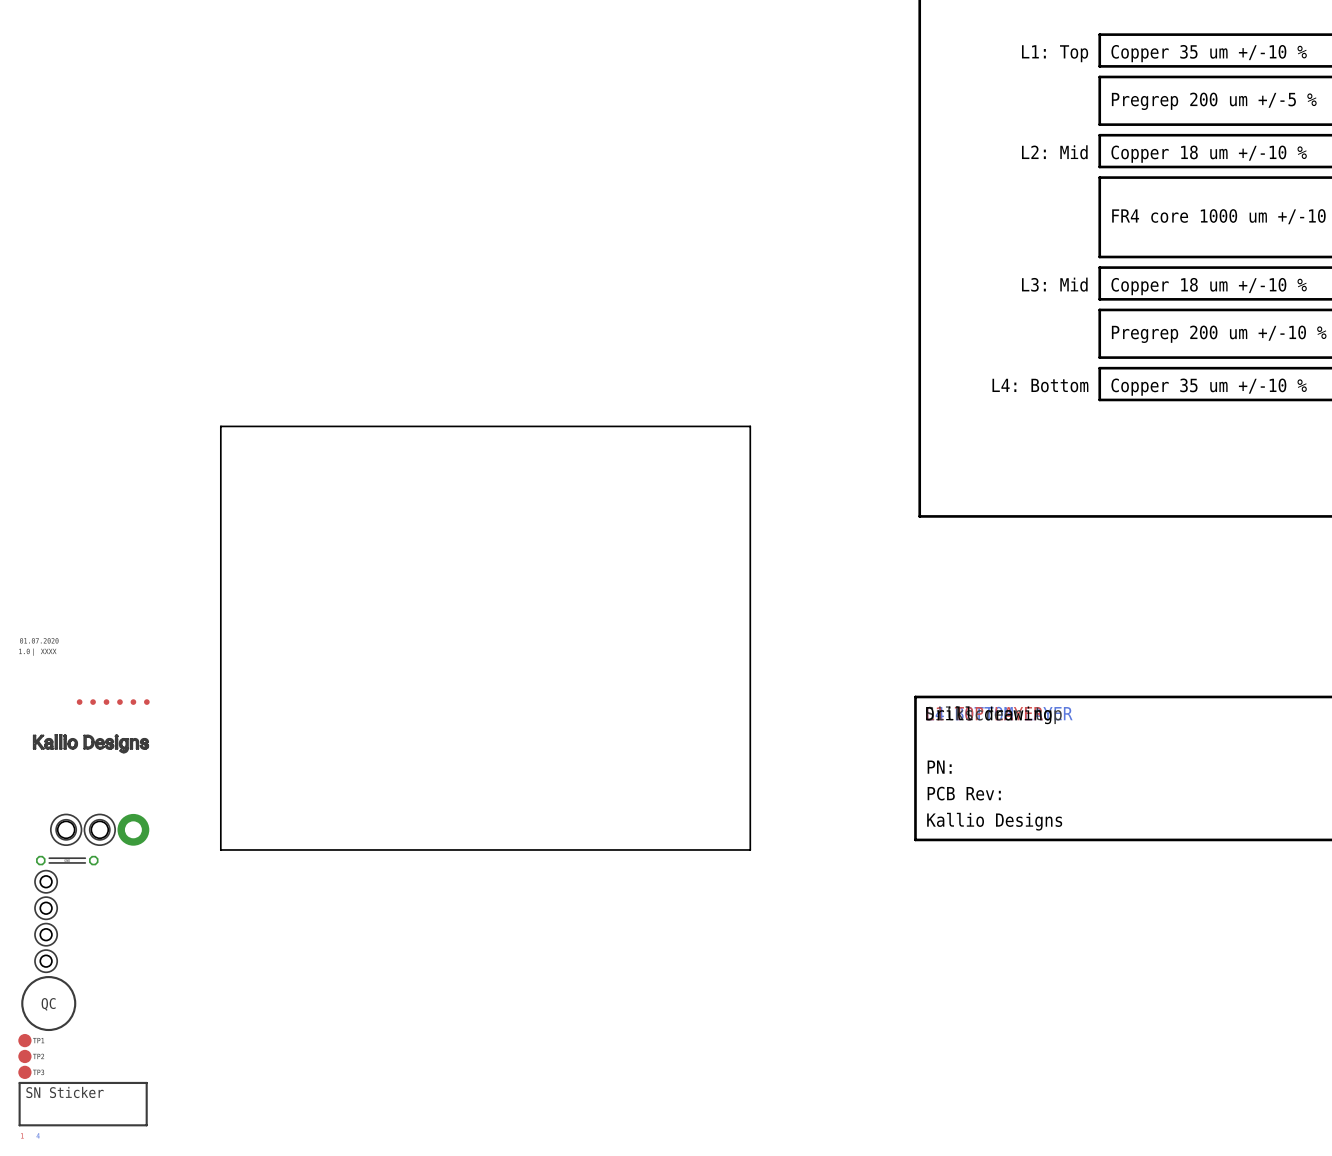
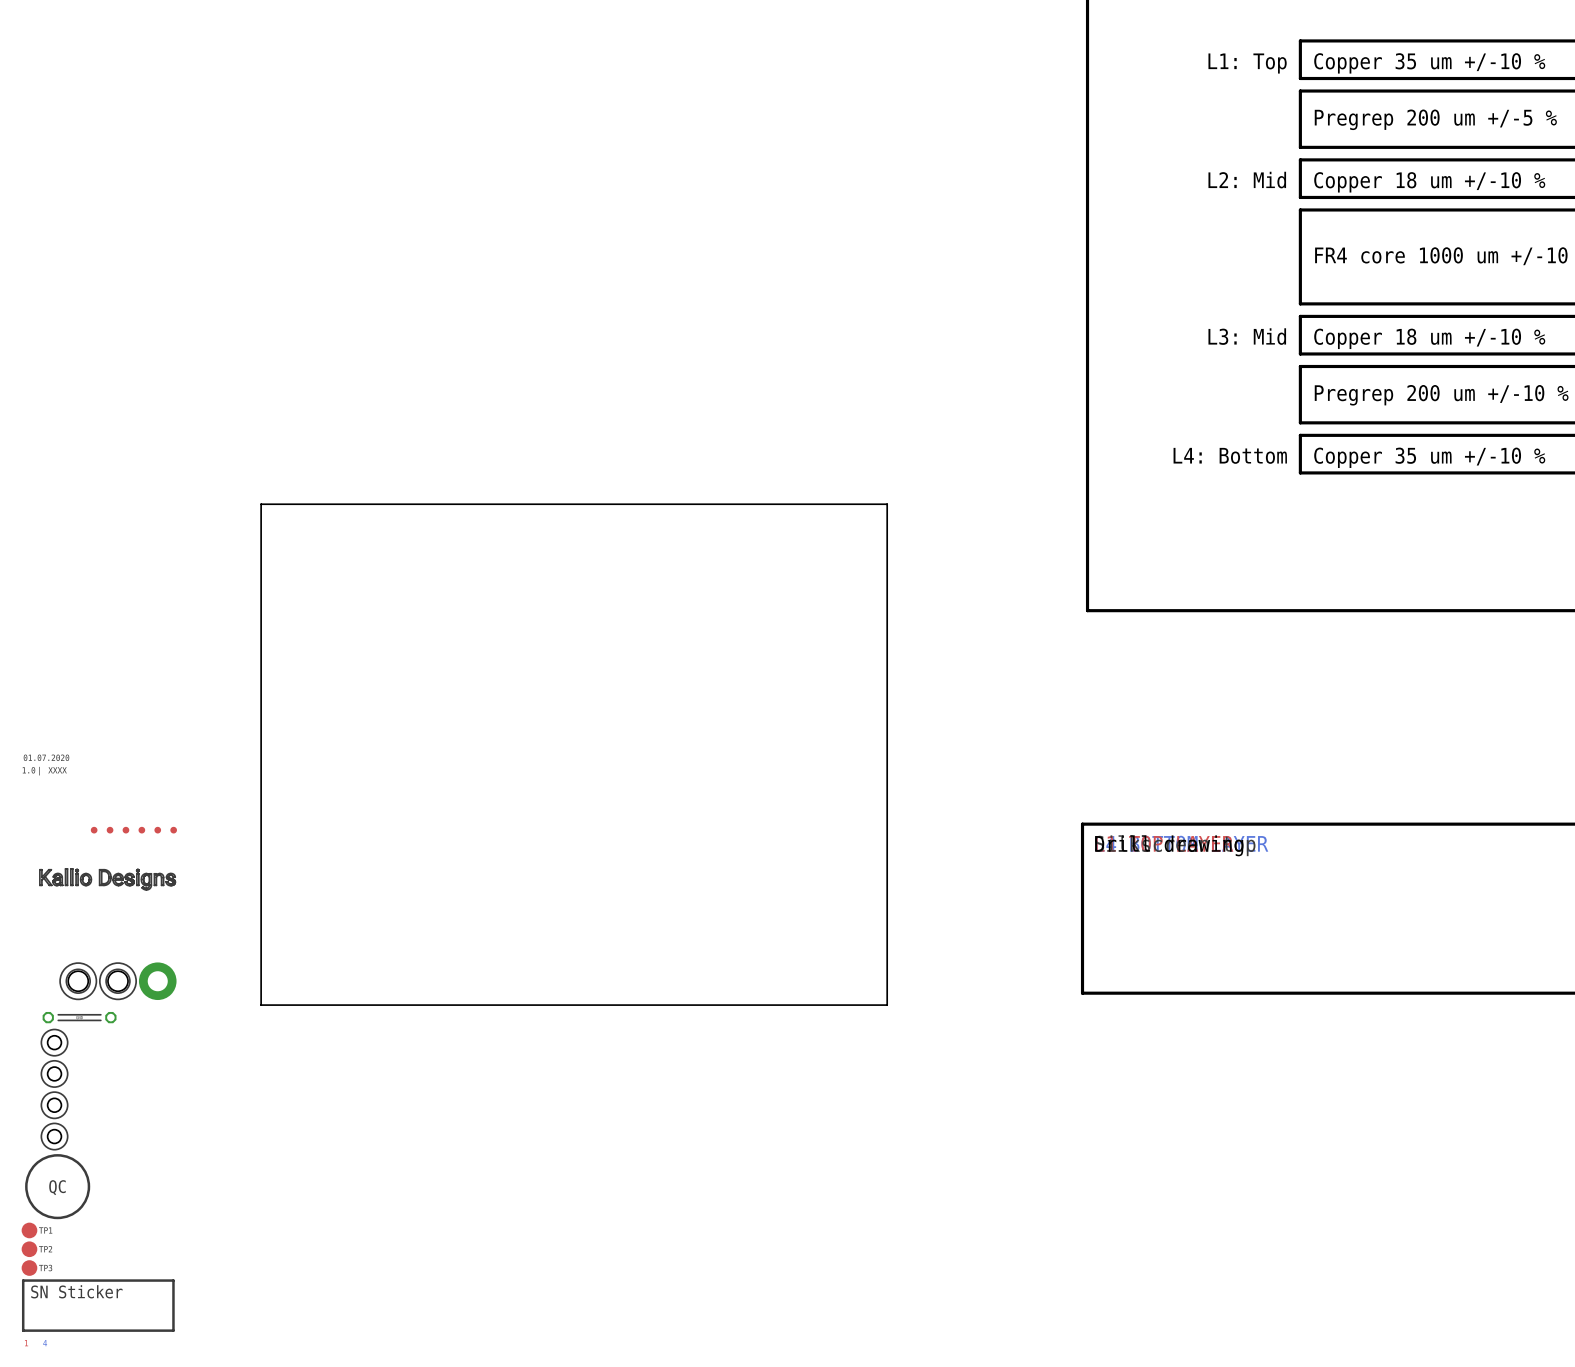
text: PN: (939, 767) -> none
text: PCB Rev: (964, 793) -> none
text: Kallio Designs (994, 821) -> none

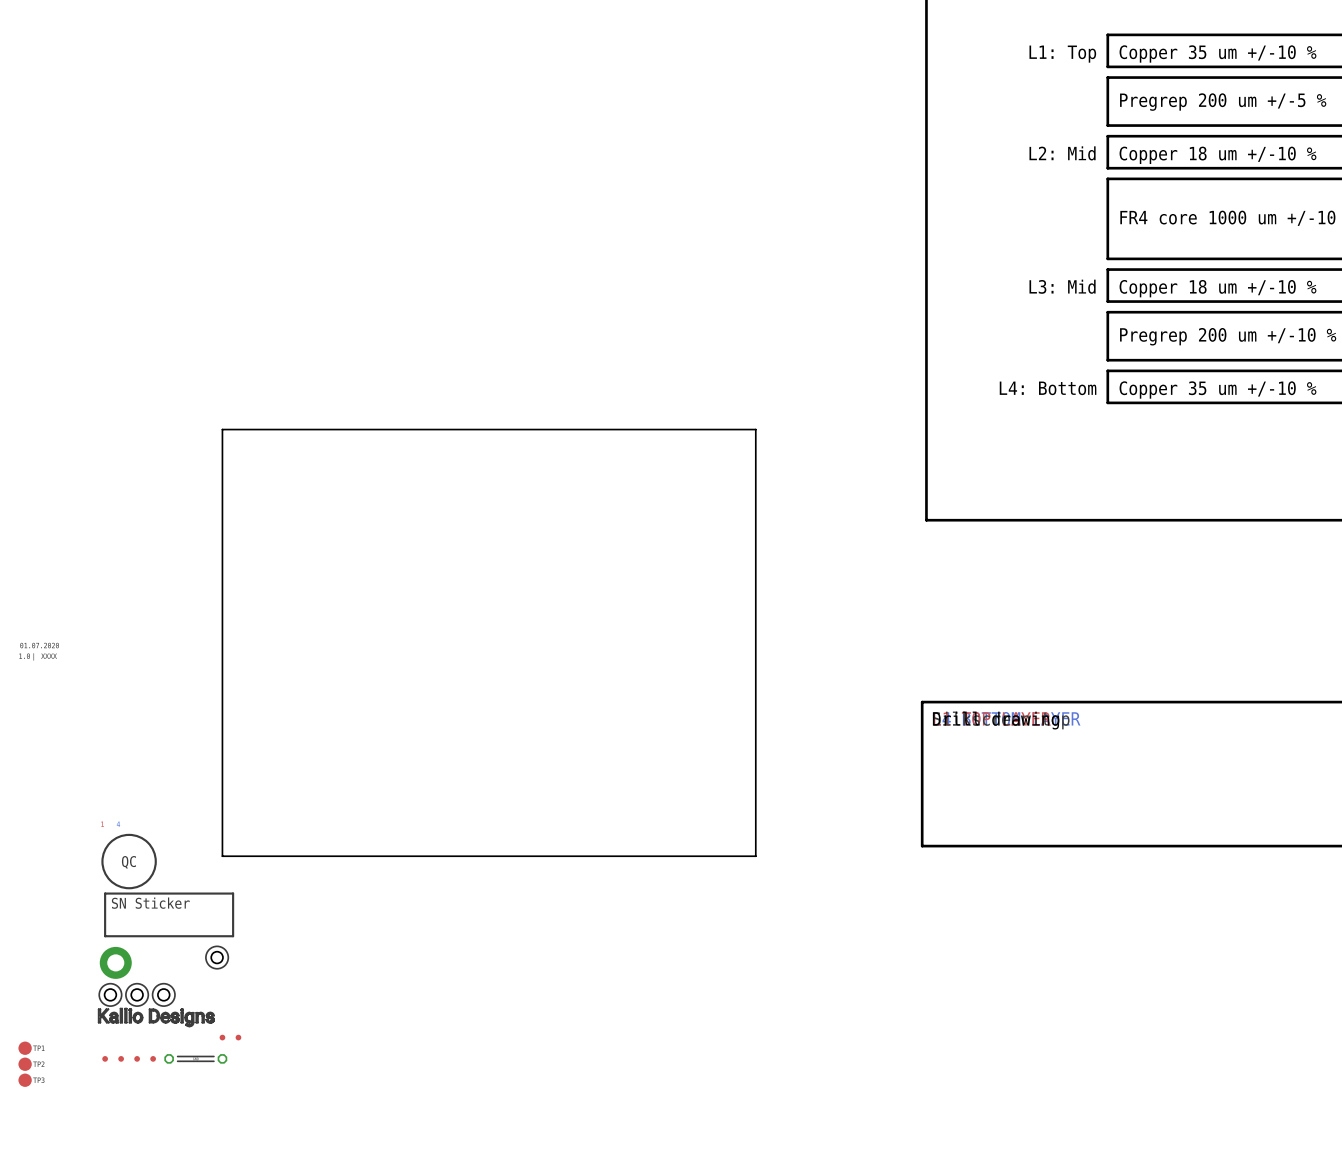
drawing: [90, 826, 98, 834] -> none
drawing: [106, 826, 114, 834] -> none
drawing: [122, 826, 130, 834] -> none
drawing: [138, 826, 146, 834] -> none
drawing: [154, 826, 162, 834] -> none
drawing: [170, 826, 177, 834] -> none
drawing: [39, 868, 176, 891] -> none
drawing: none -> [101, 833, 235, 938]
part: (78, 981) -> none
part: (118, 981) -> none
part position: (157, 981) -> (115, 962)
part: (79, 1017) -> none
part: (54, 1042) -> none
part: (54, 1073) -> none
part: (54, 1105) -> none
part: none -> (217, 957)
part: (54, 1136) -> none
drawing: [25, 1154, 91, 1220] -> none
part: none -> (110, 994)
part: none -> (137, 994)
part: none -> (163, 994)
drawing: none -> [98, 1008, 215, 1027]
drawing: none -> [219, 1034, 226, 1041]
drawing: none -> [235, 1034, 242, 1041]
drawing: none -> [102, 1056, 108, 1062]
drawing: none -> [118, 1056, 124, 1062]
drawing: none -> [134, 1056, 140, 1062]
drawing: none -> [150, 1056, 156, 1062]
part: none -> (195, 1058)
drawing: [21, 1279, 175, 1332] -> none

